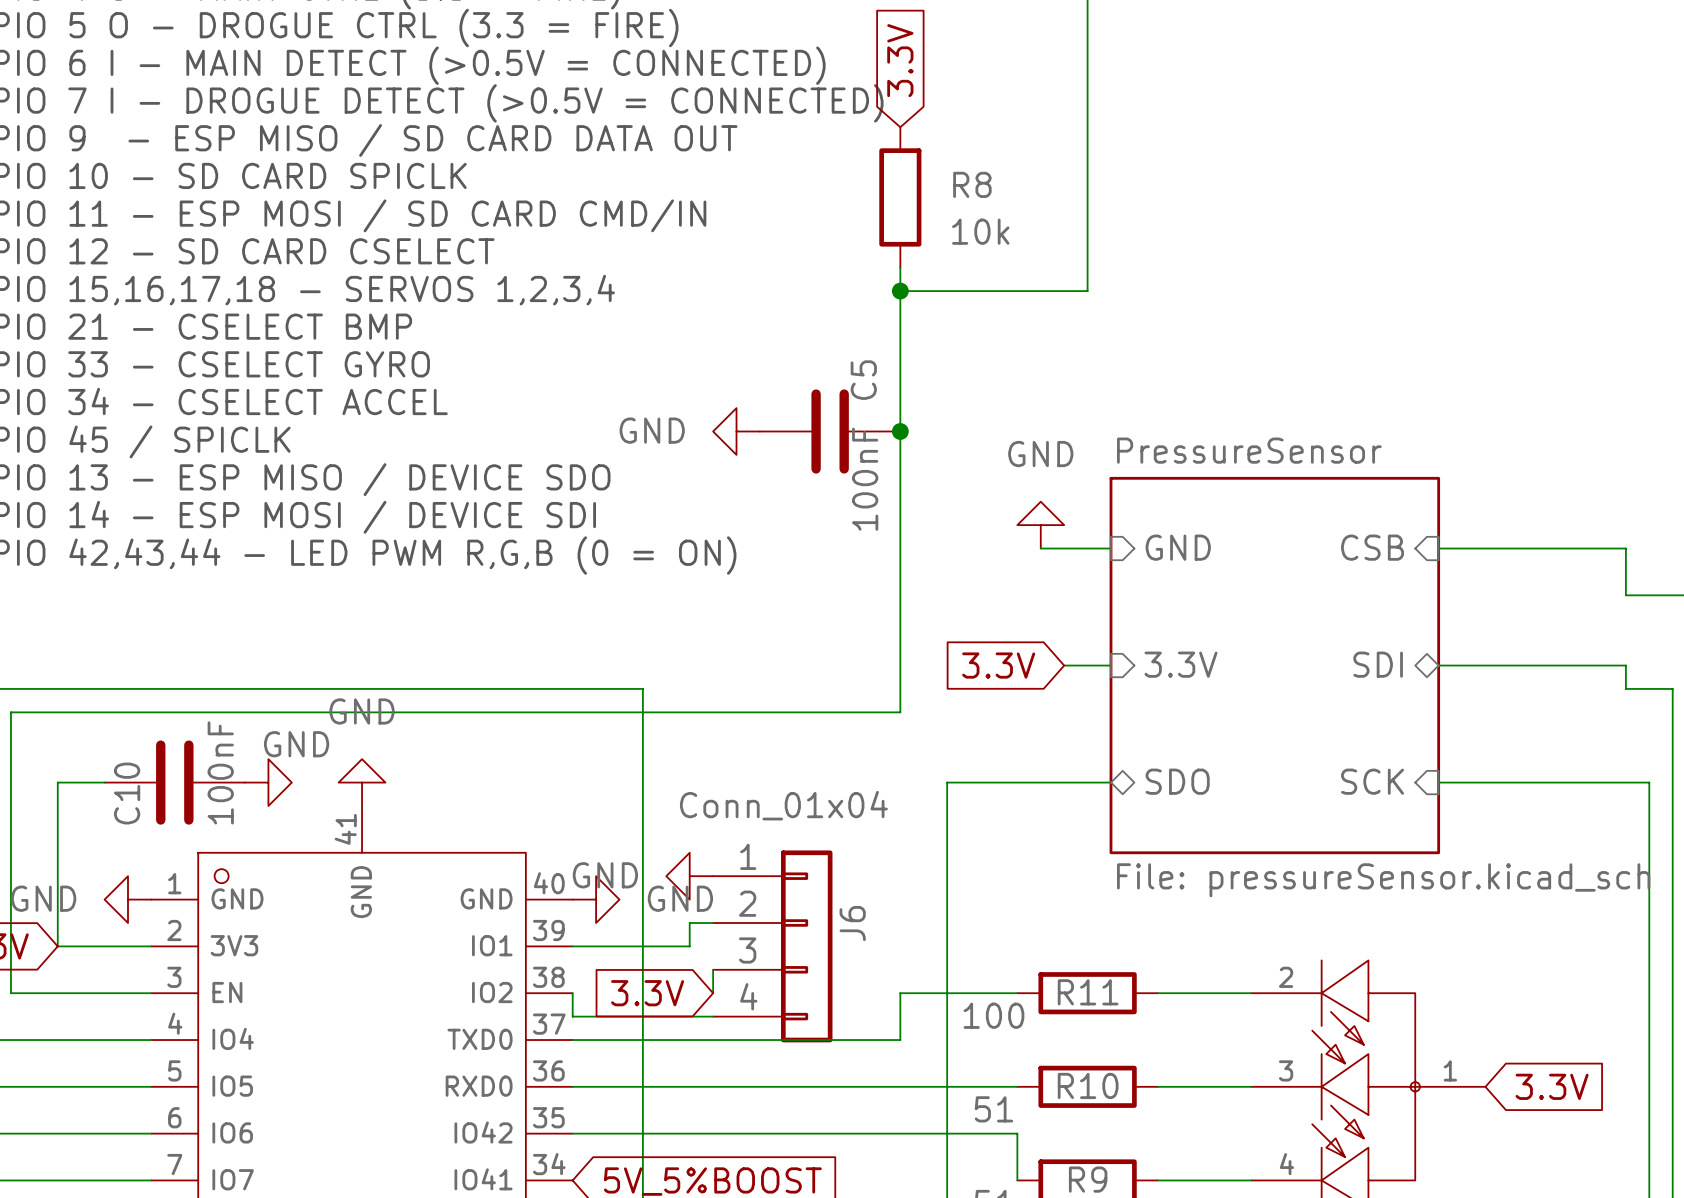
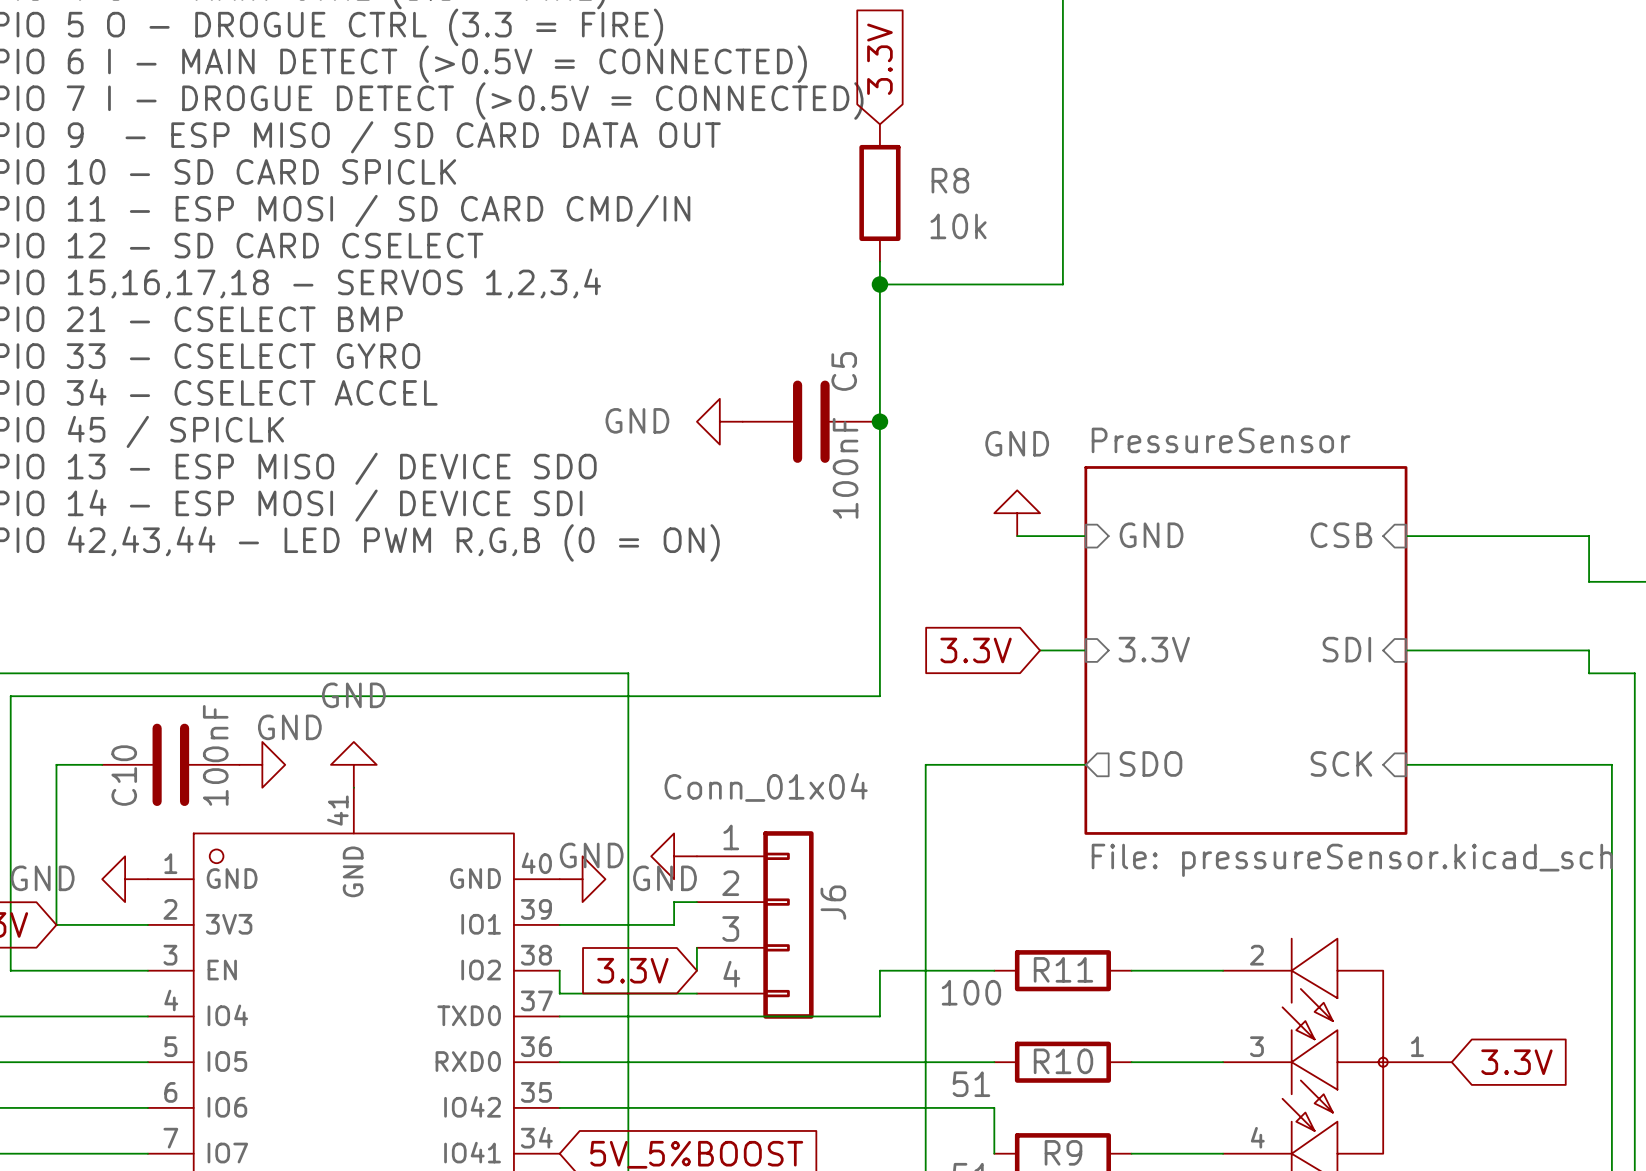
sheet pin shape: bidirectional (1378, 664) -> input (1346, 649)
sheet pin shape: bidirectional (1177, 781) -> output (1150, 763)

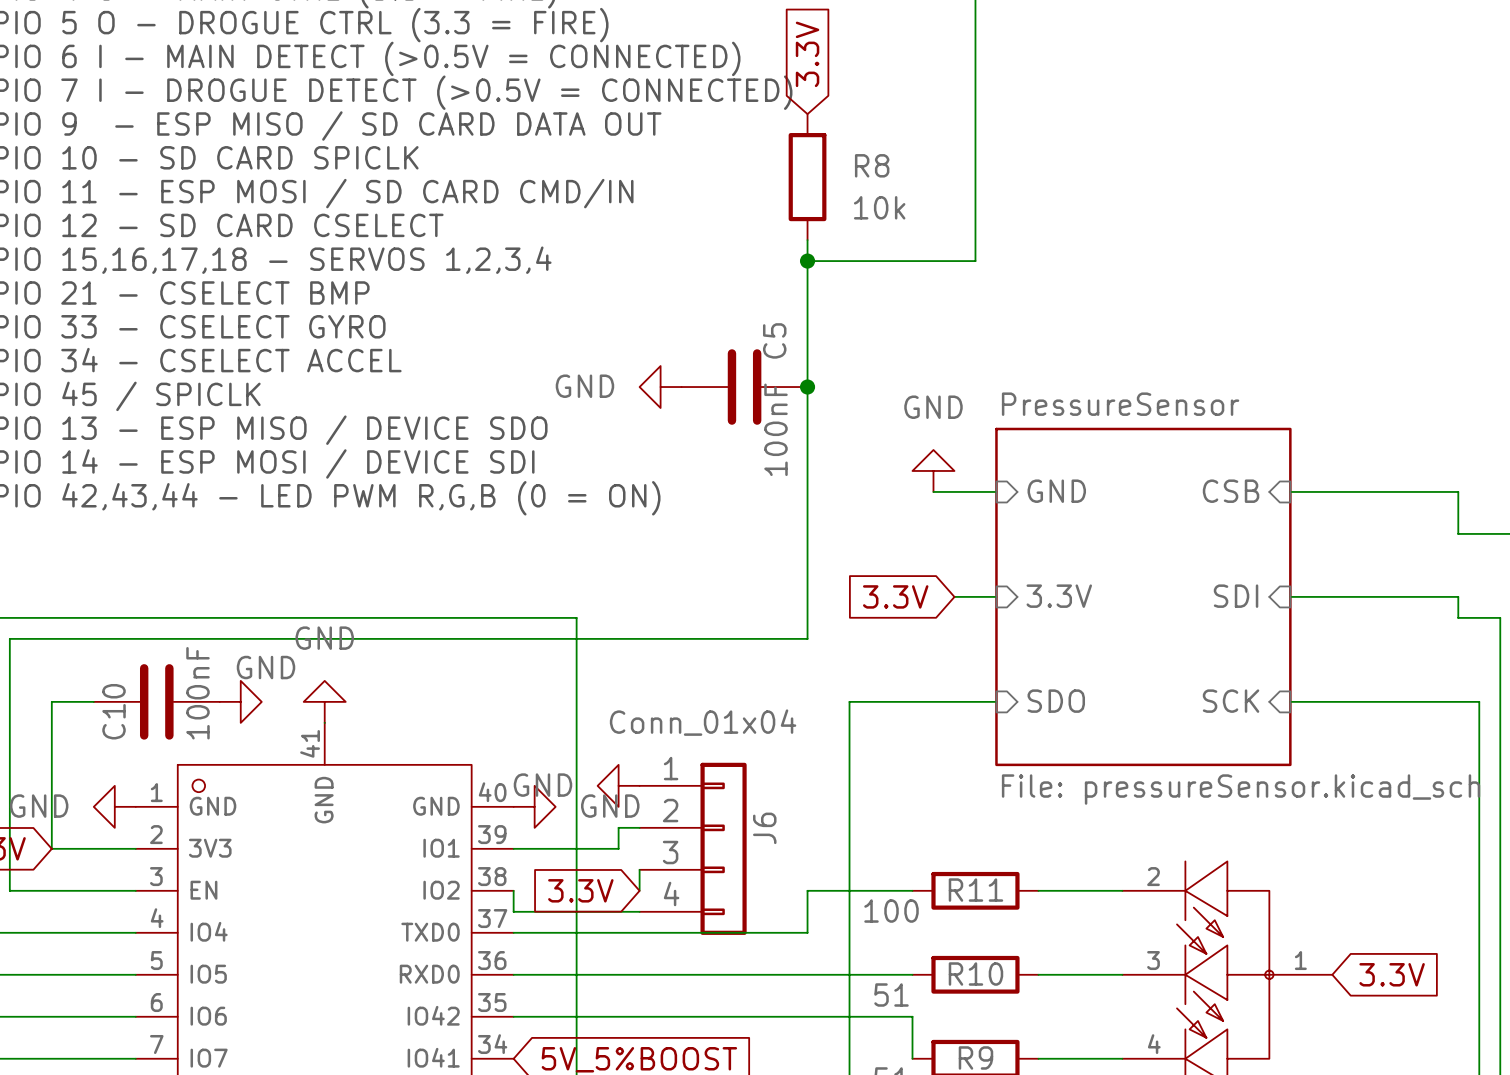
sheet pin shape: output (1150, 763) -> input (1056, 701)

